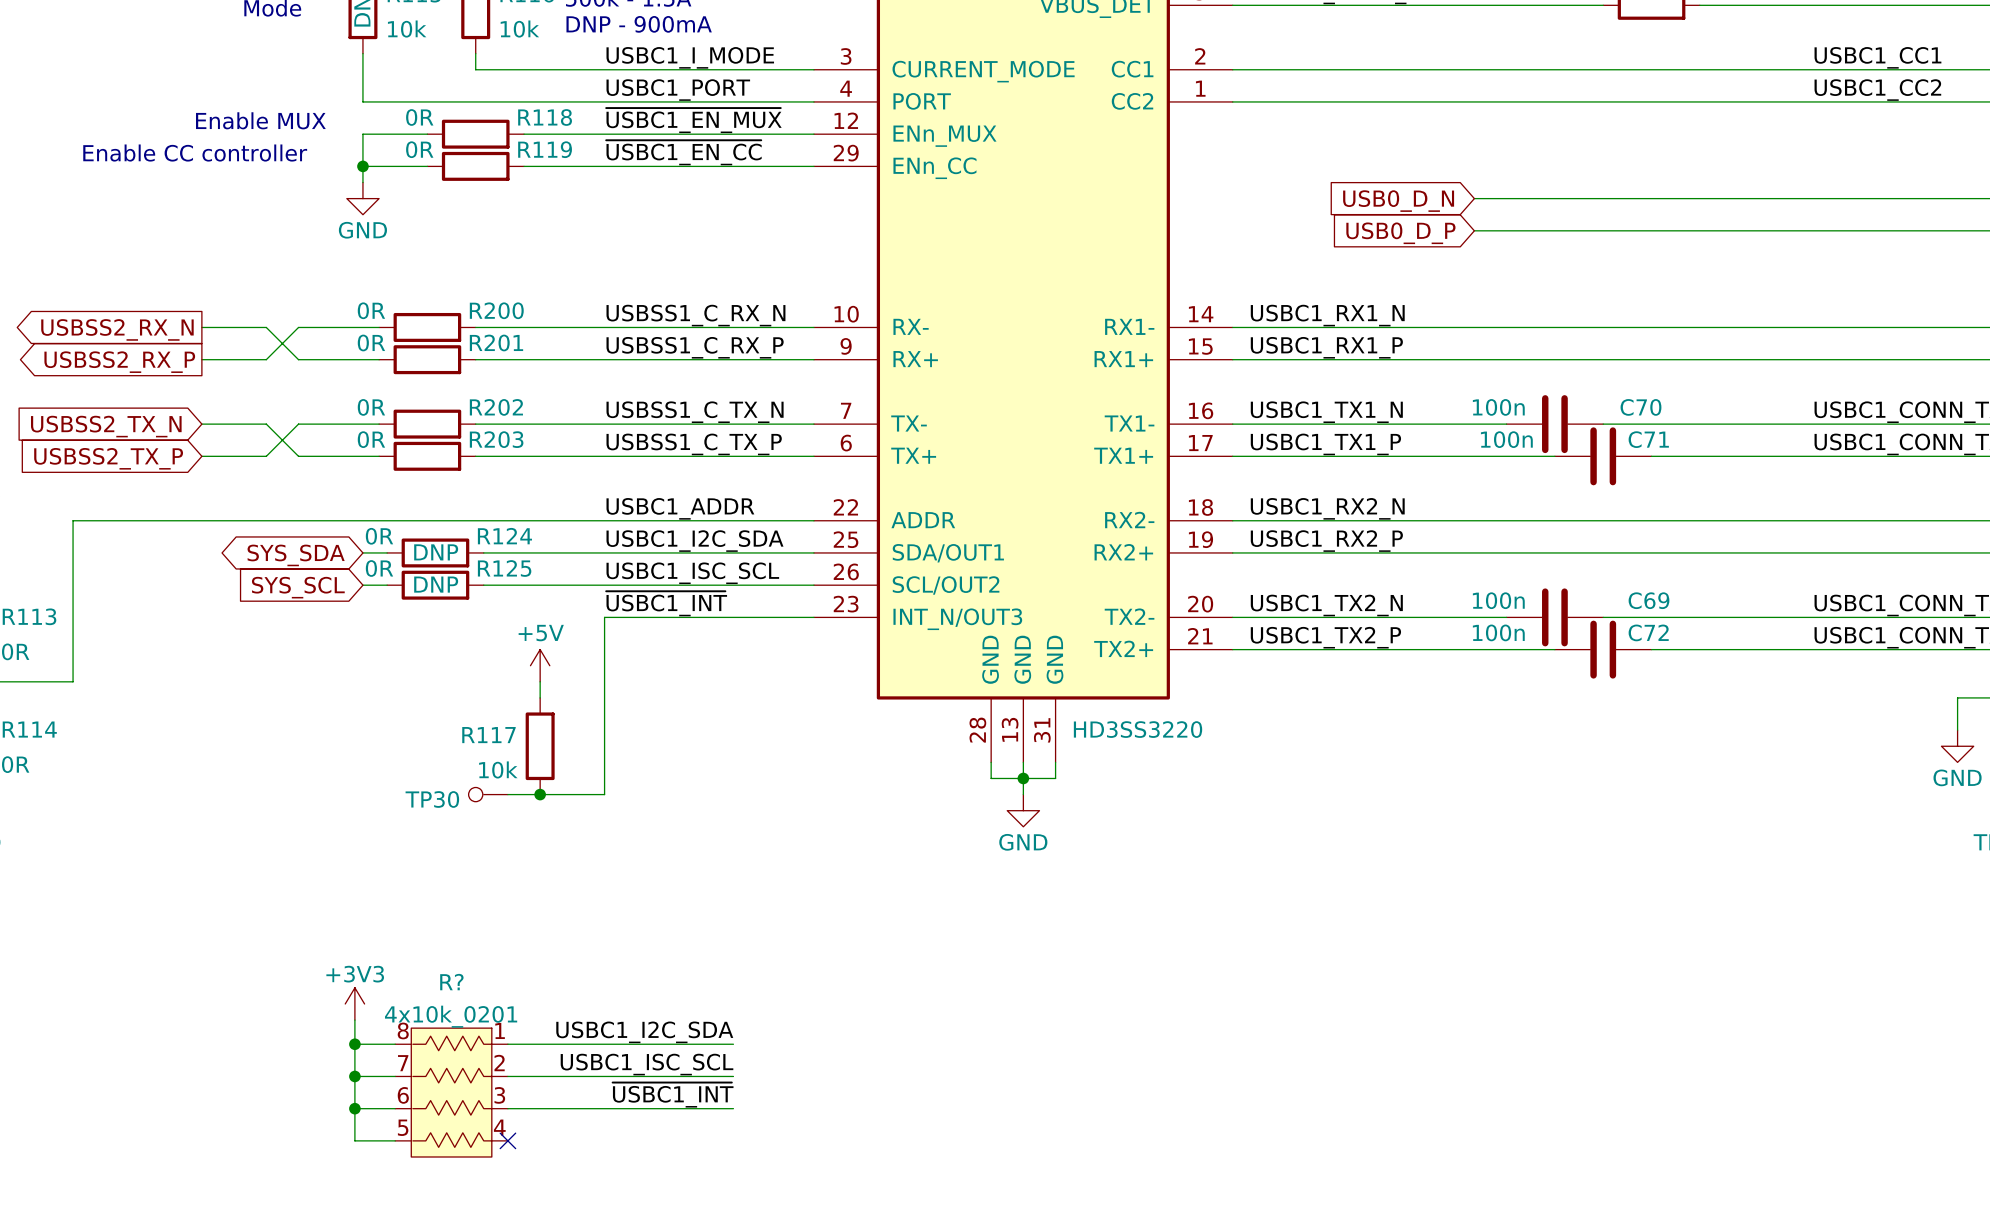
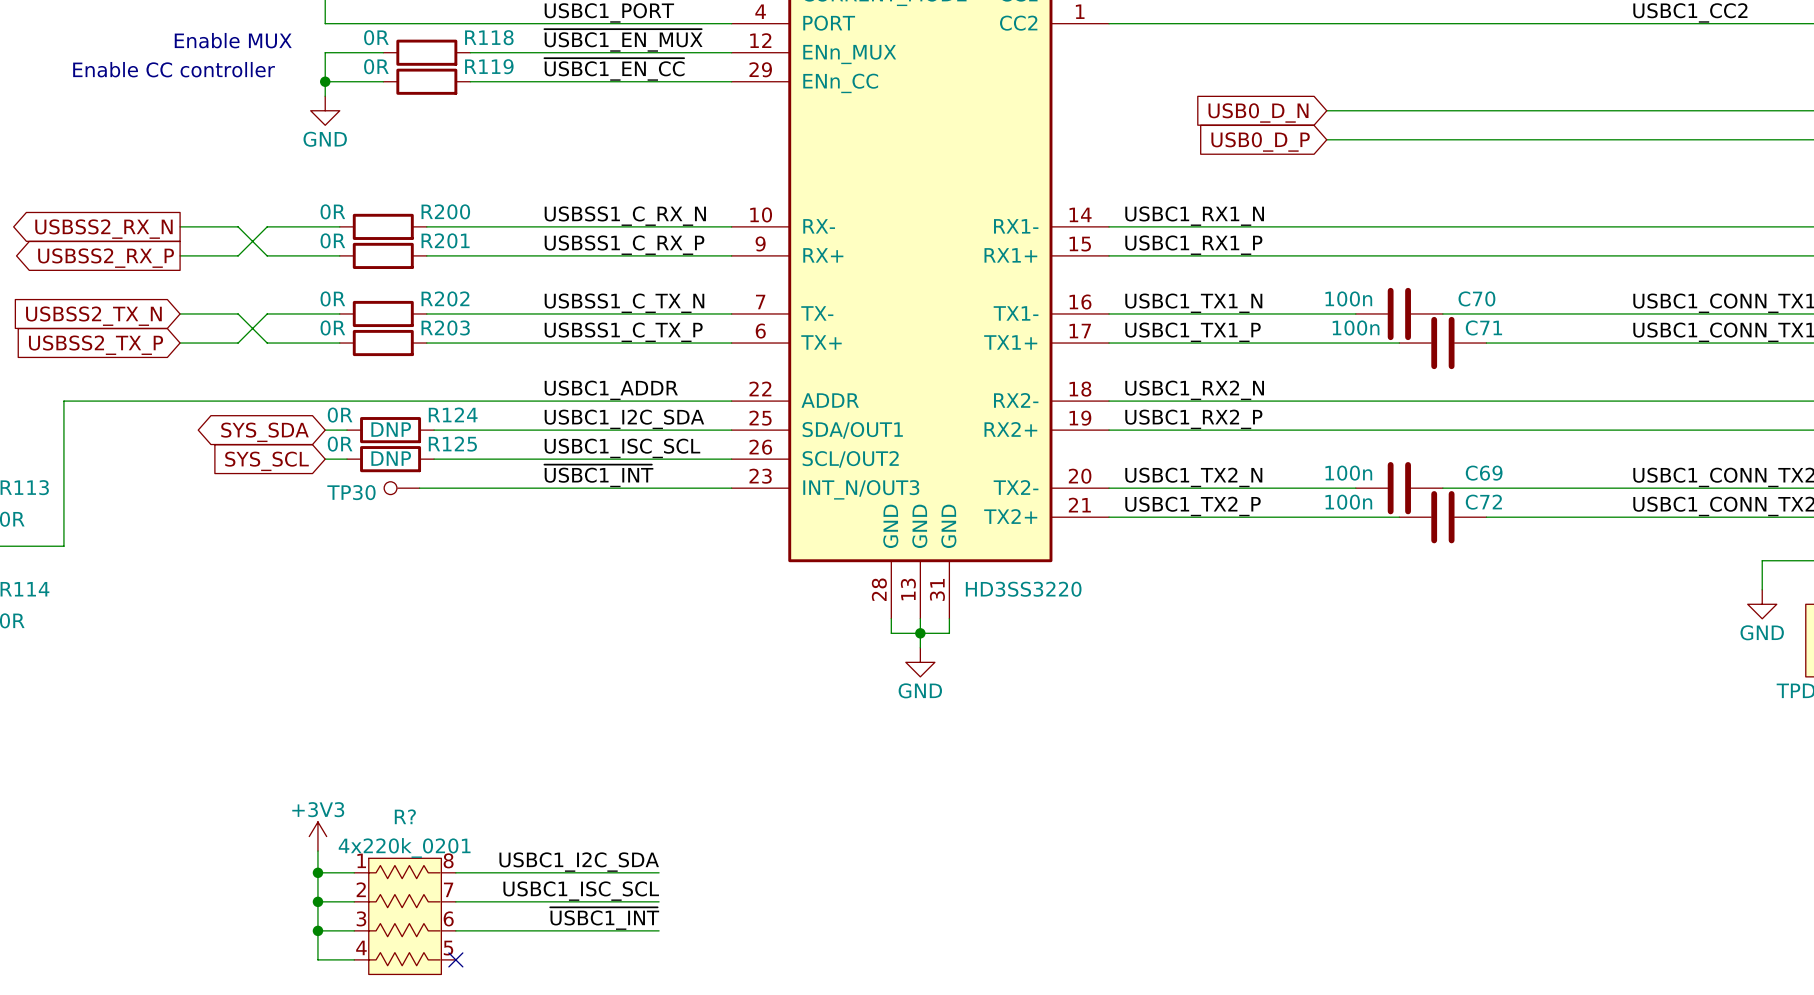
wire: (604, 617) (604, 794) (507, 794) -> (542, 488) (419, 488)
power symbol: +5V (540, 665) -> none
wire: (540, 681) (540, 697) -> none
R117: (540, 746) -> none
TP30 position: (488, 794) -> (401, 488)
junction: (540, 794) -> none
R? text: 4x10k_0201 (451, 1016) -> 4x220k_0201 (404, 847)
R? flip: as is (451, 1092) -> left-right (405, 916)

